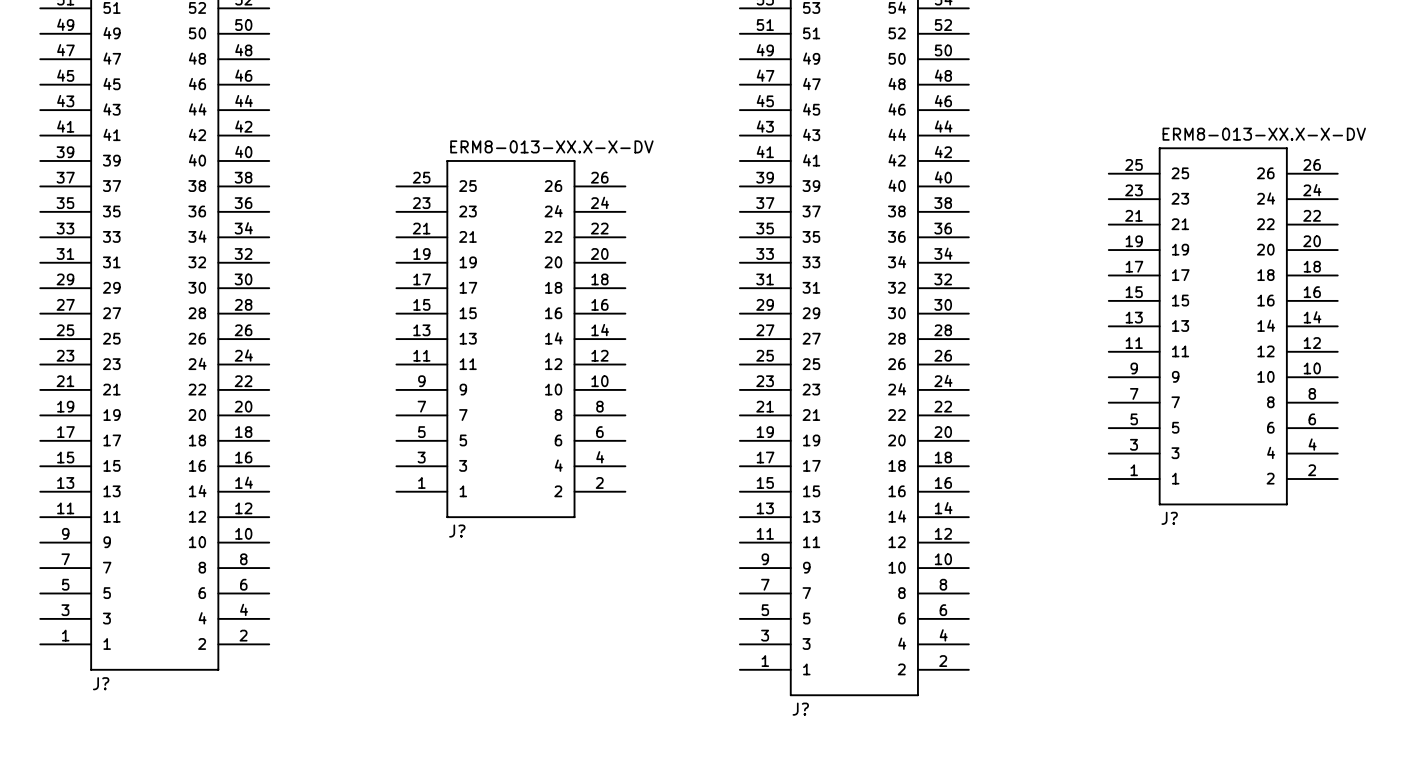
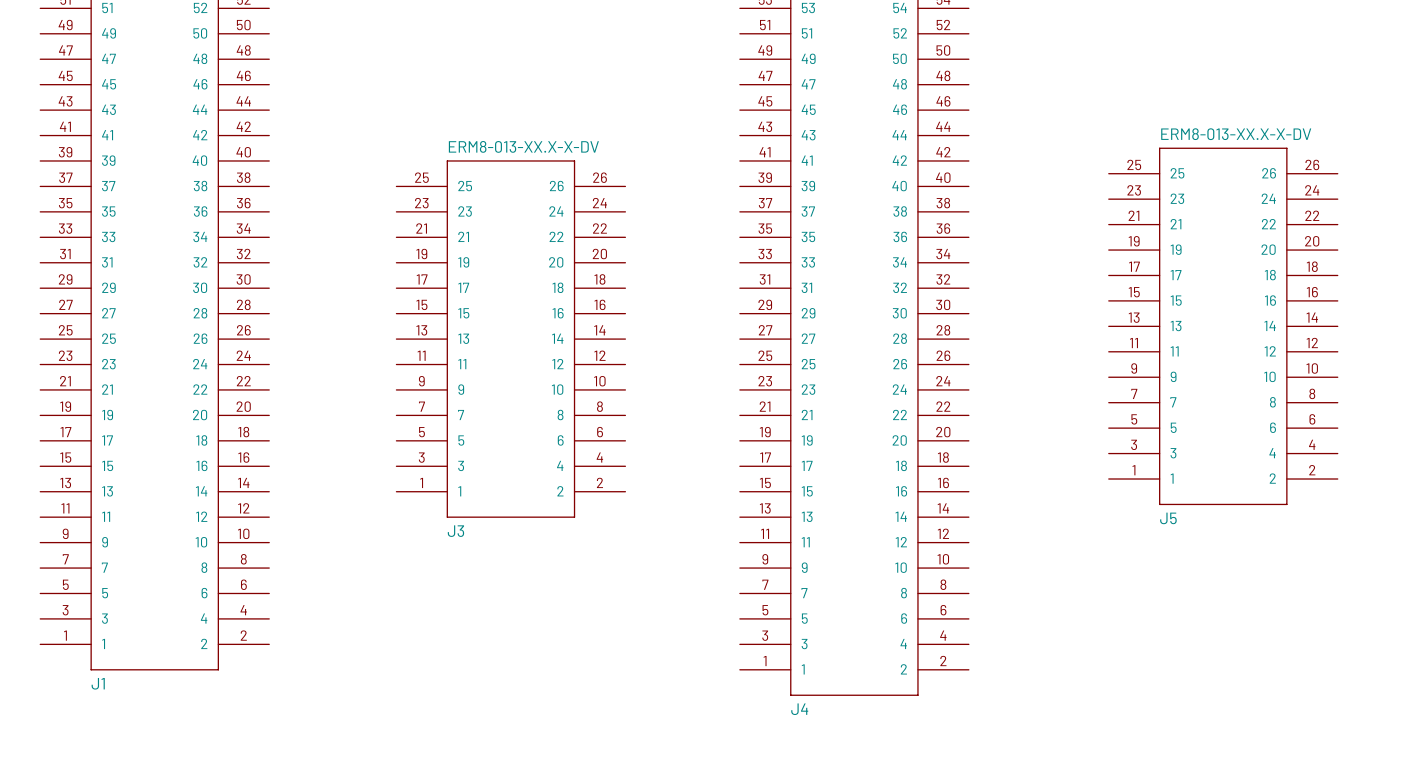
J? name: J? (1169, 518) -> J5 (1168, 518)
J? name: J? (457, 531) -> J3 (455, 531)
J? name: J? (101, 683) -> J1 (98, 683)
J? name: J? (800, 709) -> J4 (799, 709)

